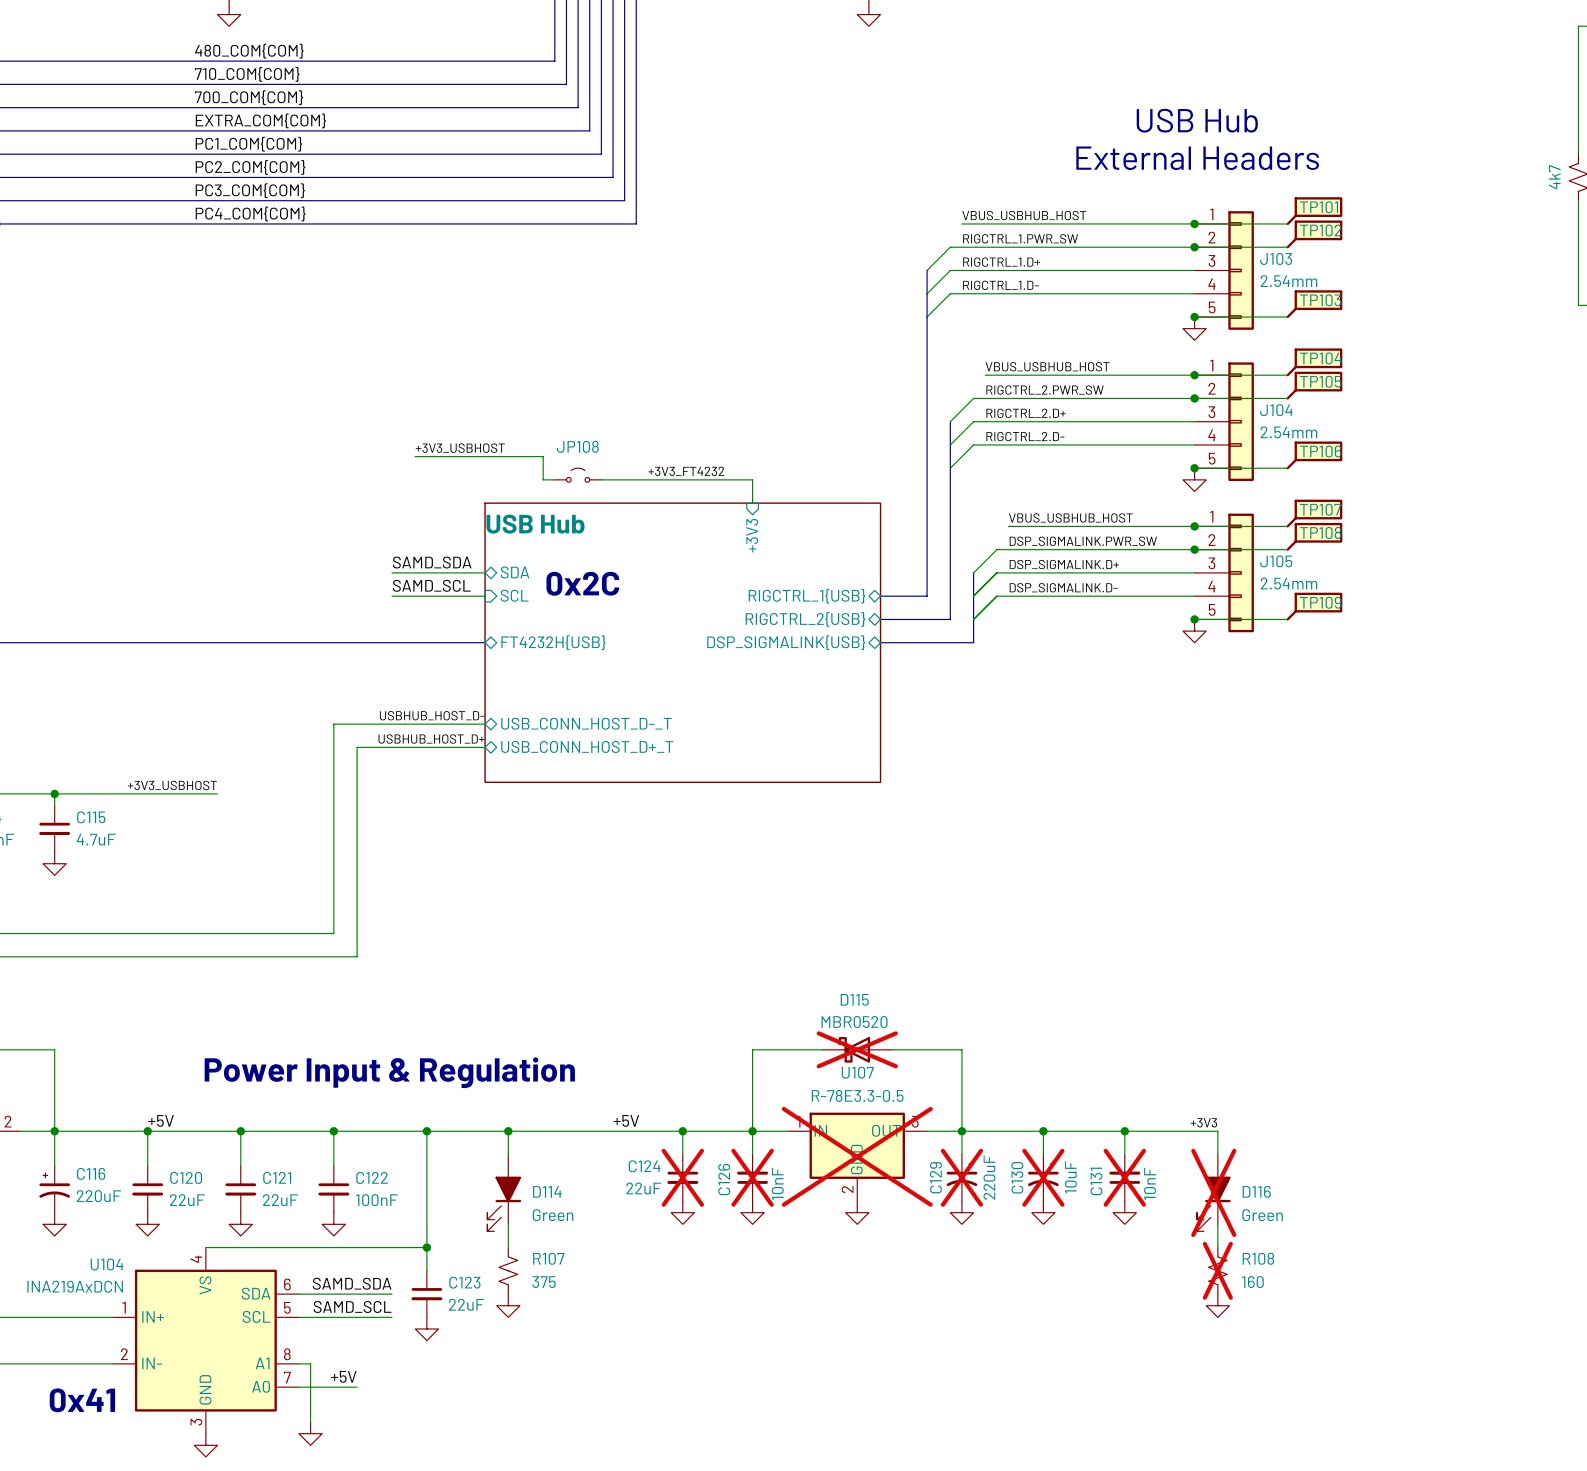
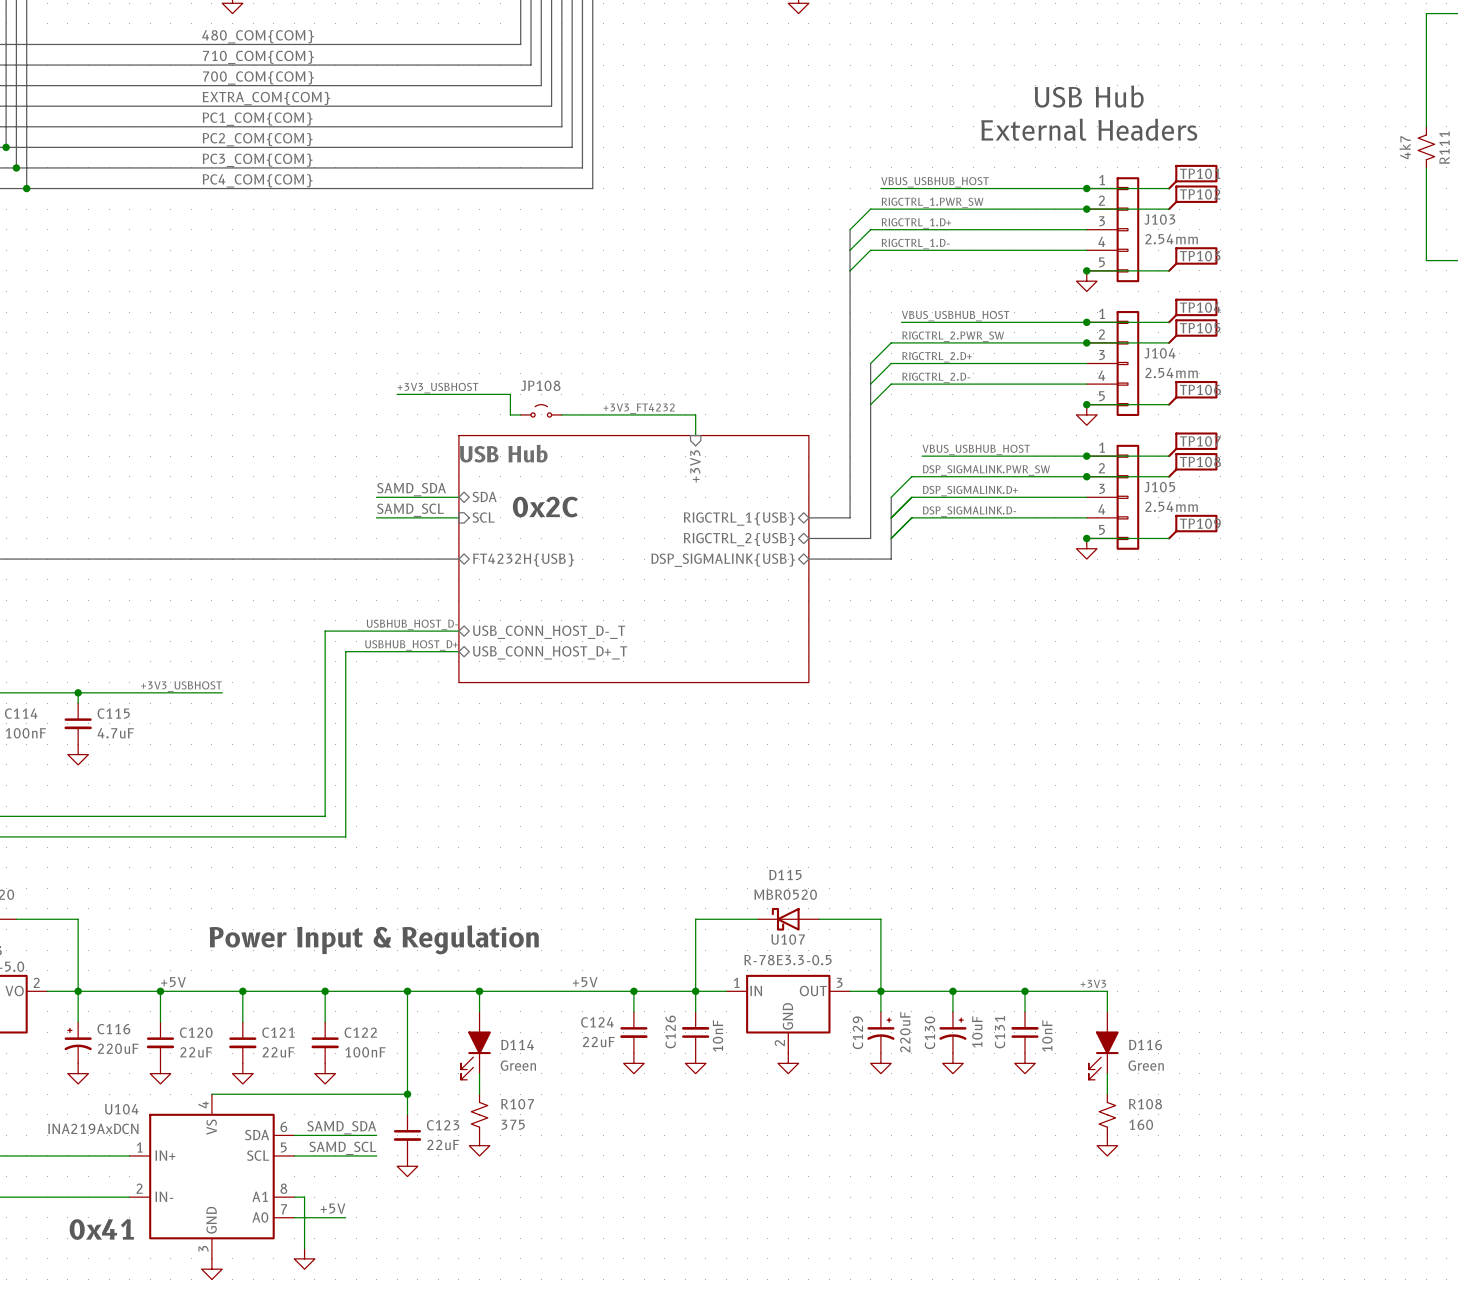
D115 do-not-place cross: (857, 1049) -> none
U107 do-not-place cross: (857, 1156) -> none
C124 do-not-place cross: (682, 1177) -> none
C126 do-not-place cross: (752, 1177) -> none
C129 do-not-place cross: (961, 1177) -> none
C130 do-not-place cross: (1043, 1177) -> none
C131 do-not-place cross: (1124, 1177) -> none
D116 do-not-place cross: (1213, 1192) -> none
R108 do-not-place cross: (1217, 1270) -> none

